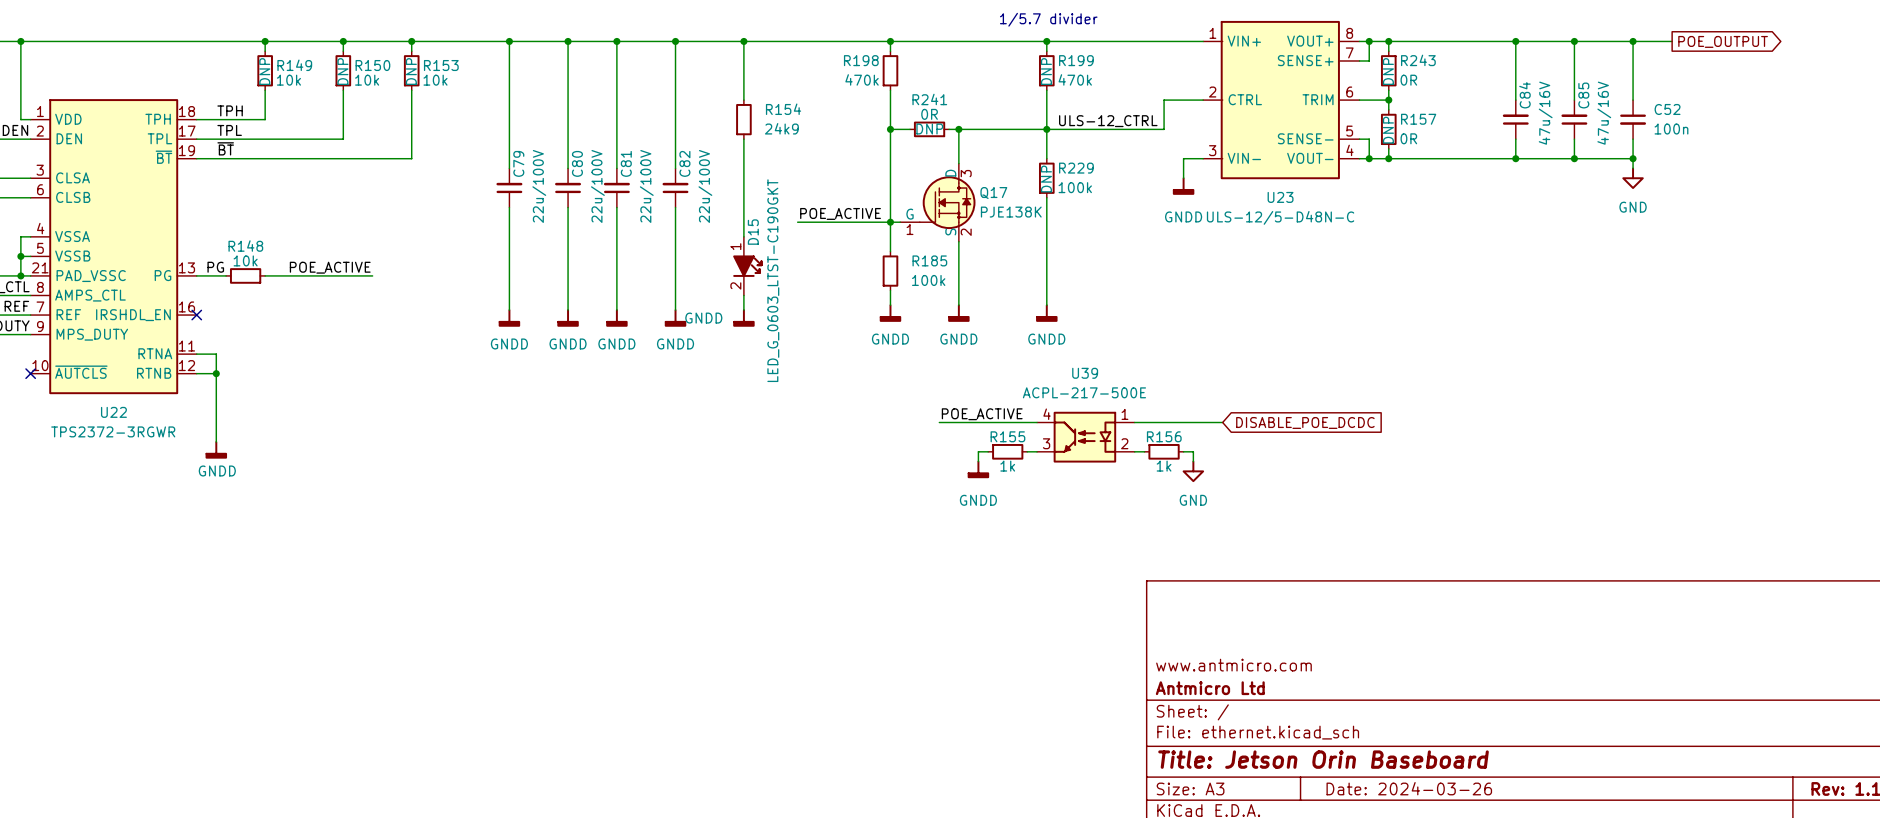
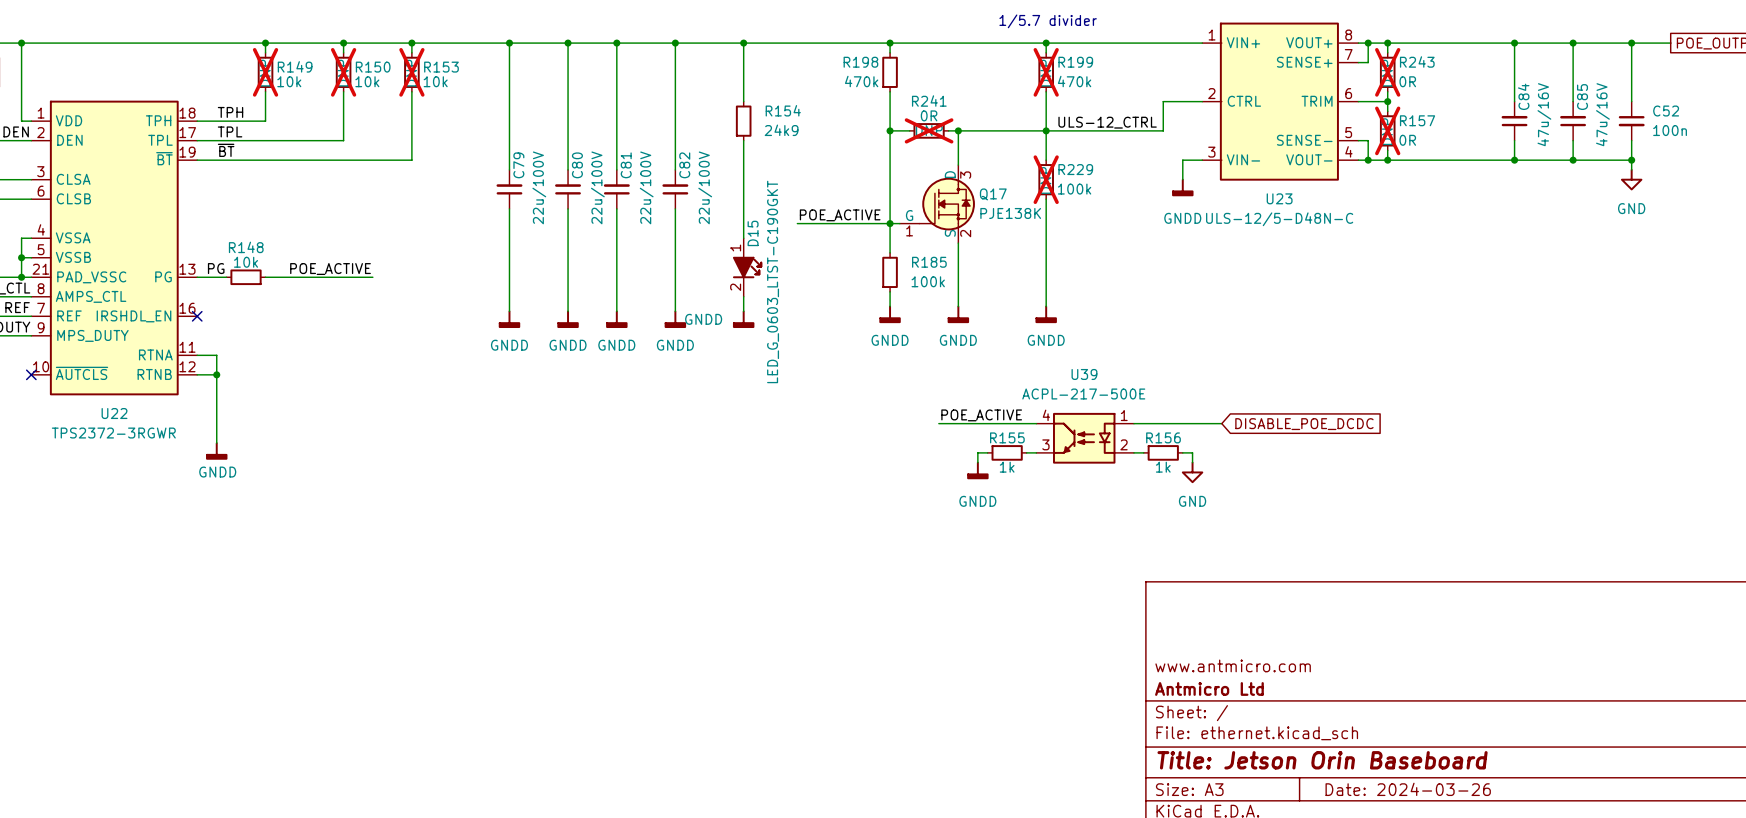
R149 do-not-place cross: none -> (265, 72)
R150 do-not-place cross: none -> (343, 72)
R153 do-not-place cross: none -> (411, 72)
R199 do-not-place cross: none -> (1046, 72)
R243 do-not-place cross: none -> (1387, 72)
R241 do-not-place cross: none -> (929, 130)
R157 do-not-place cross: none -> (1387, 130)
R229 do-not-place cross: none -> (1046, 179)

